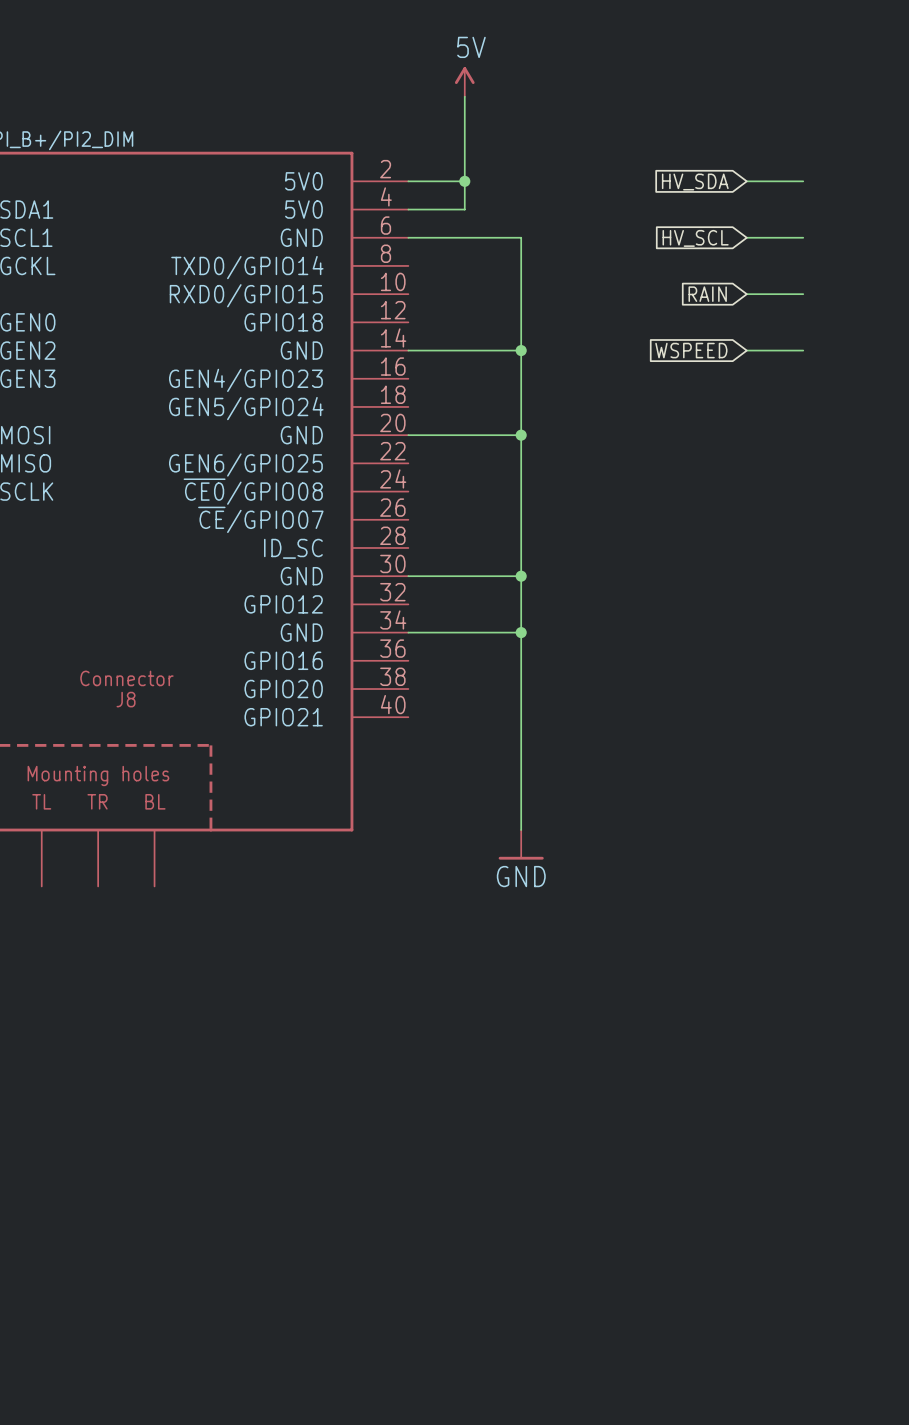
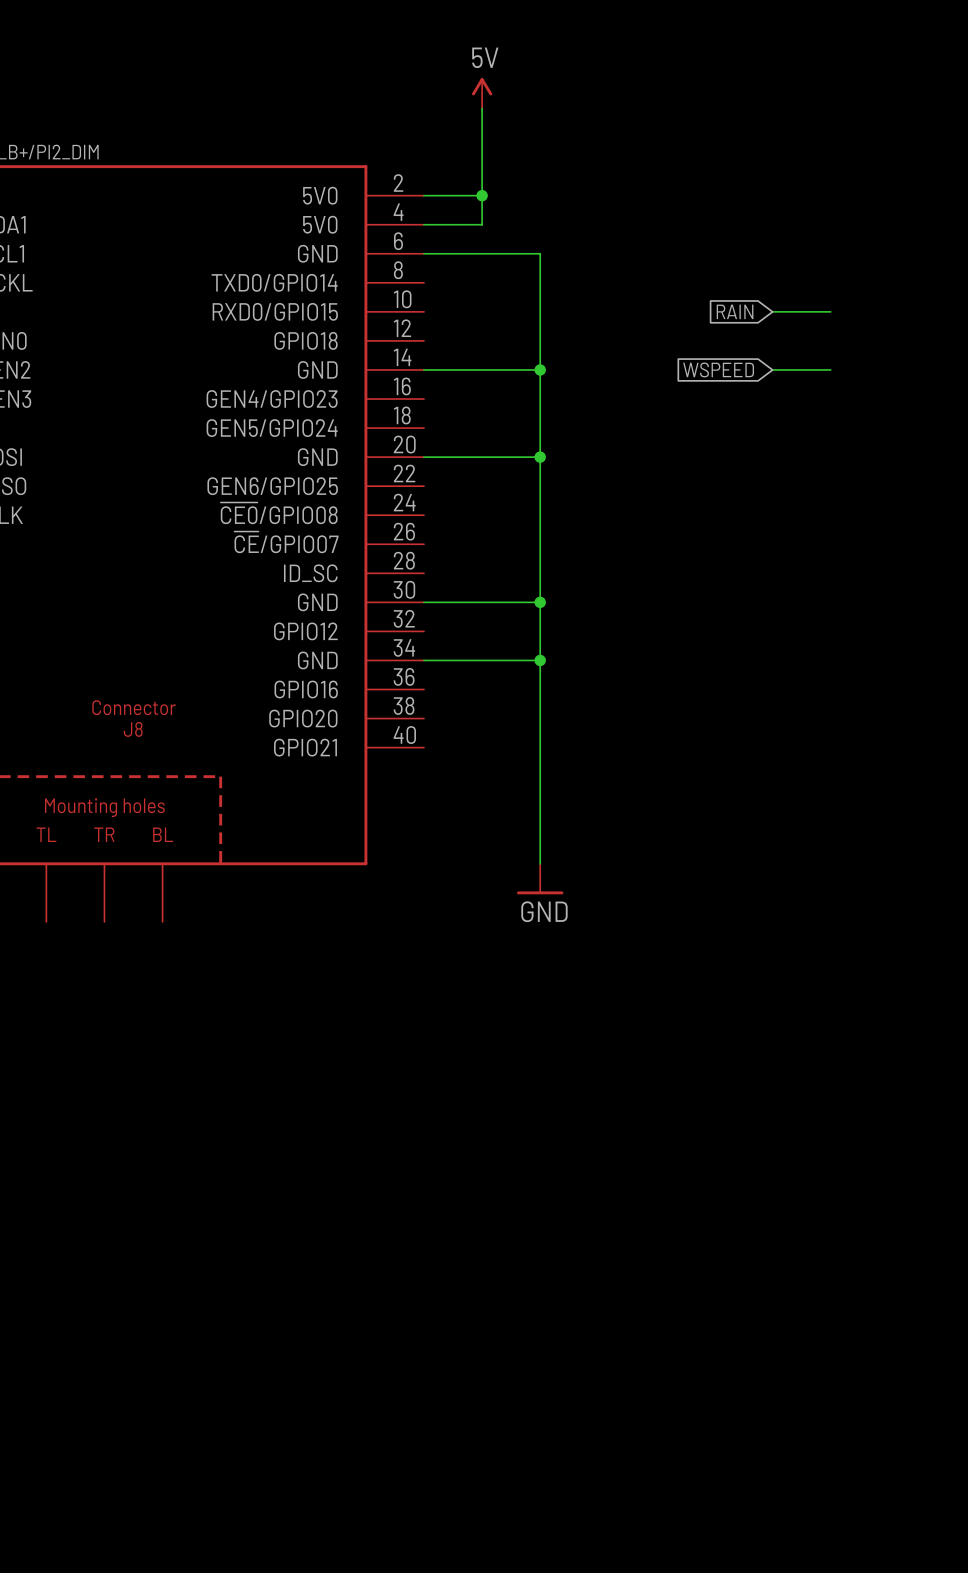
wire: (746, 181) (803, 181) -> none
global label: HV_SDA (695, 182) -> none
wire: (746, 237) (803, 237) -> none
global label: HV_SCL (695, 238) -> none

